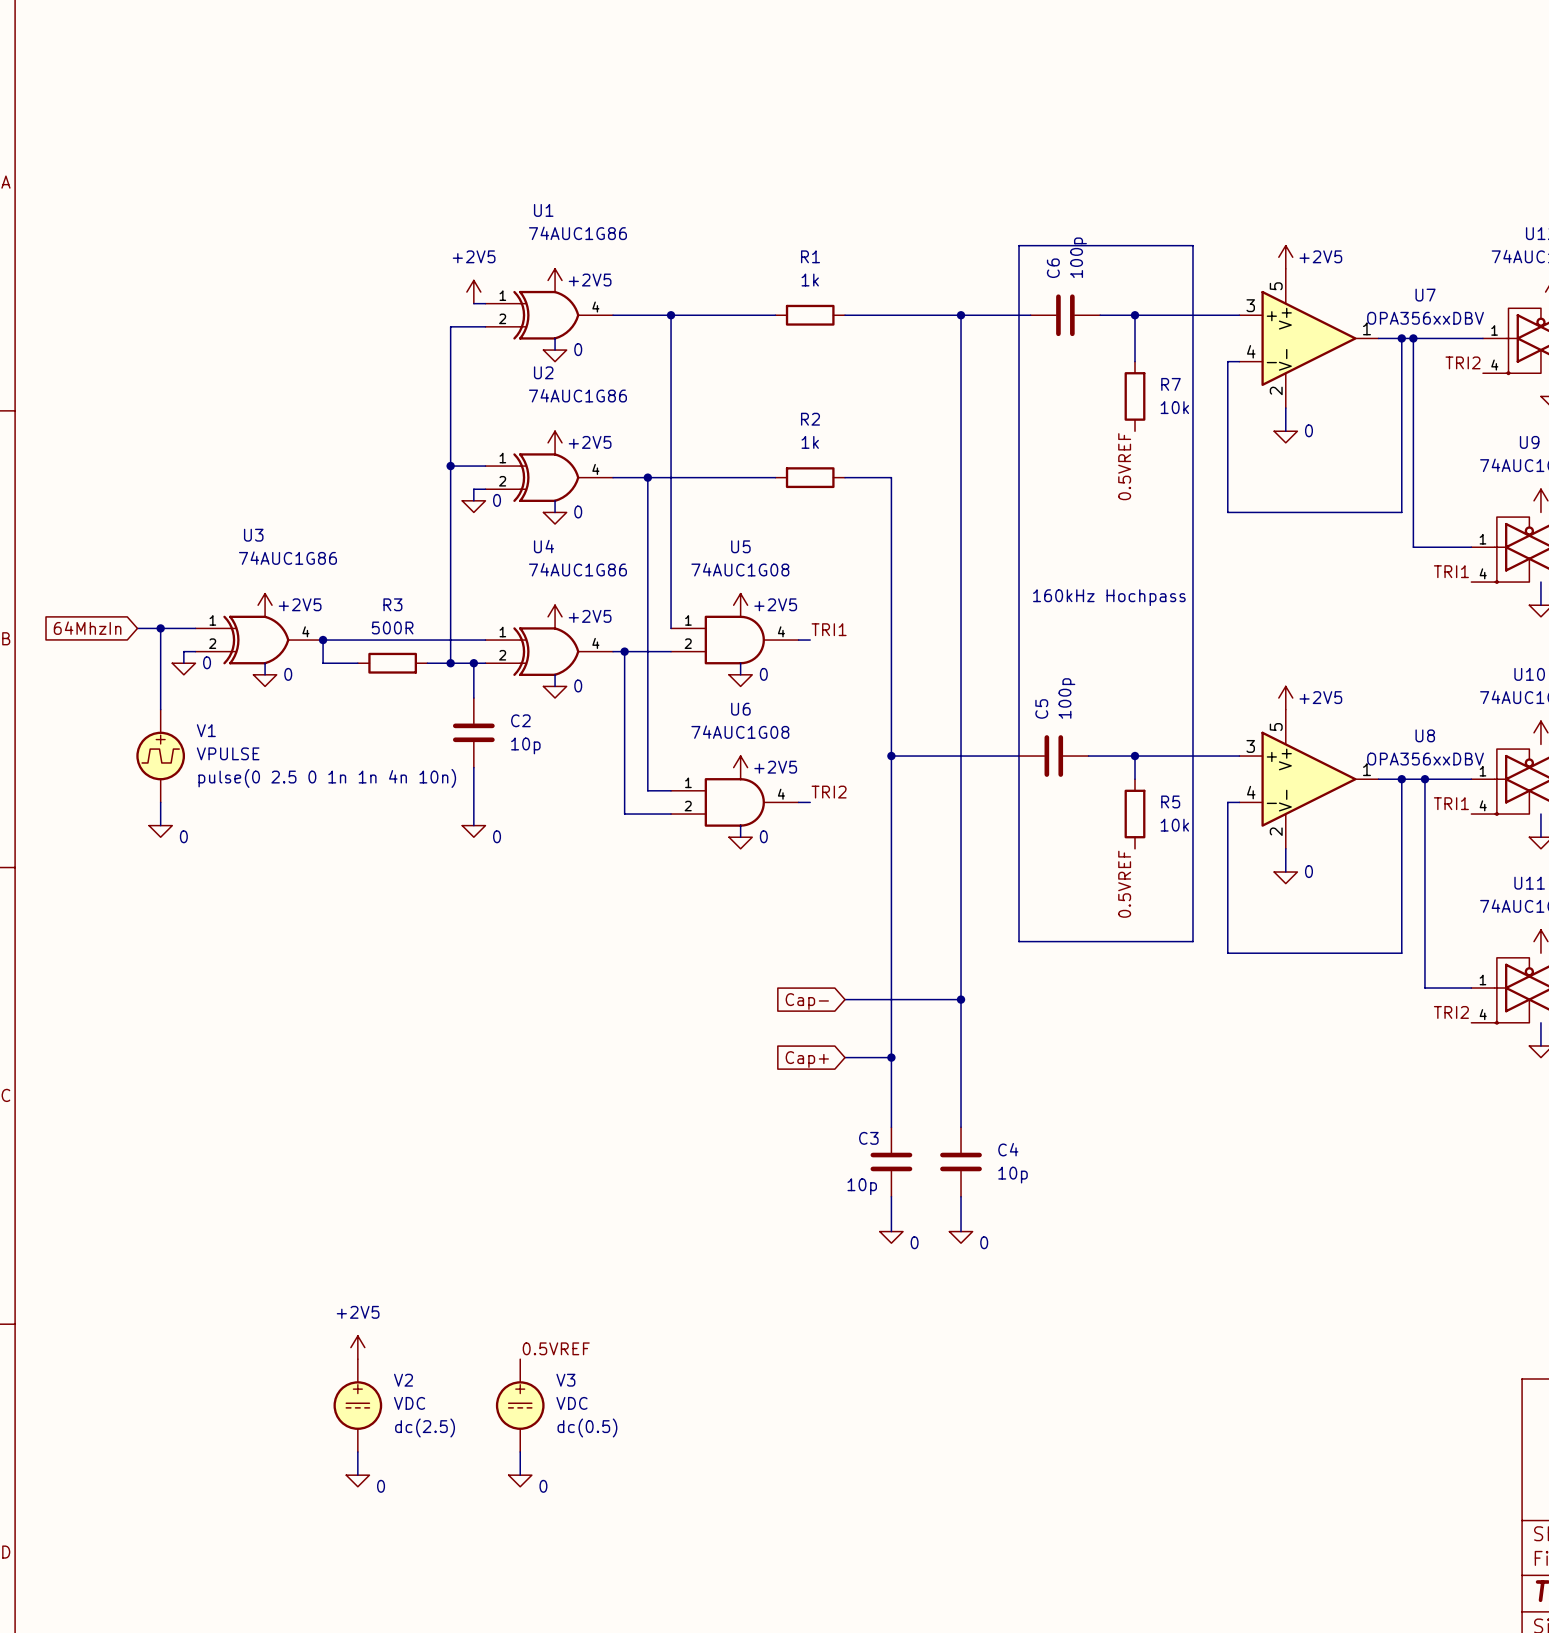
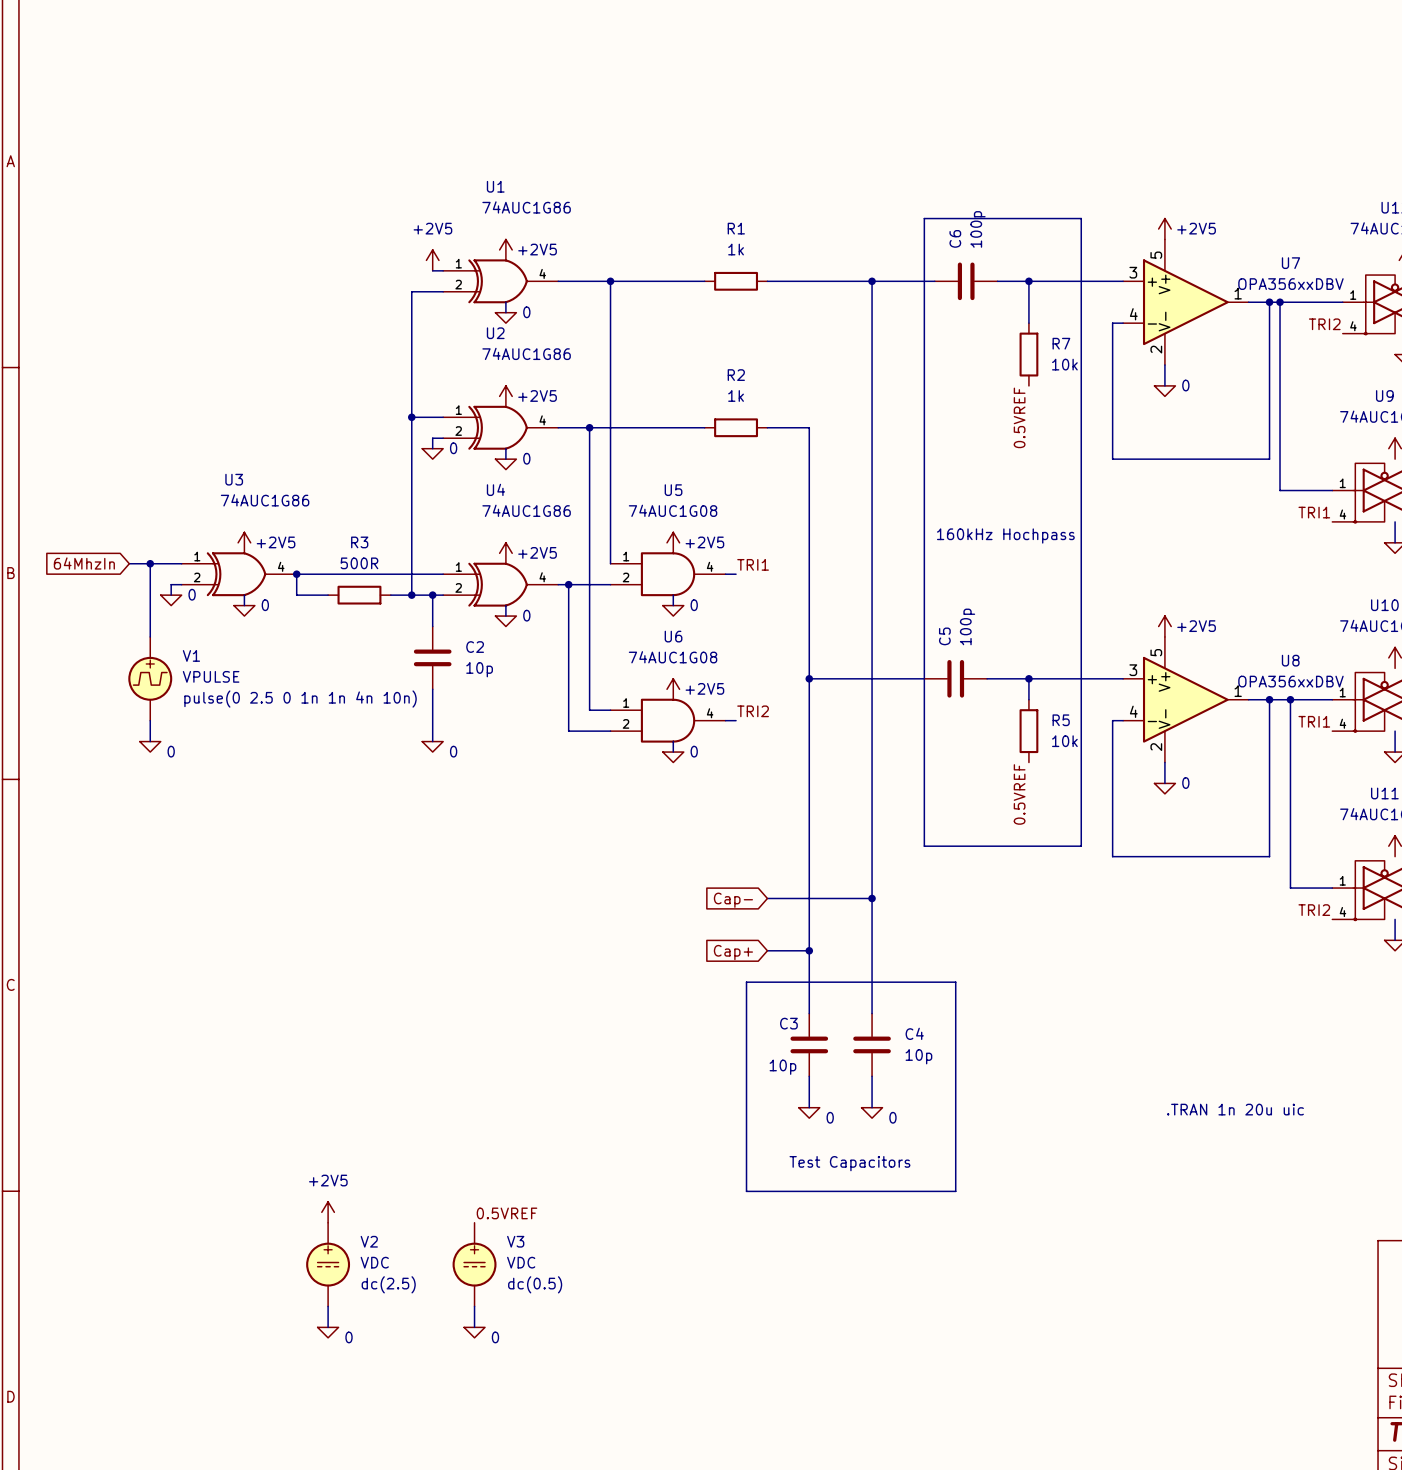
line: none -> (746, 982) (746, 1191) (955, 1191) (955, 982) (746, 982)
text: none -> .TRAN 1n 20u uic (1235, 1109)
text: none -> Test Capacitors (849, 1163)

